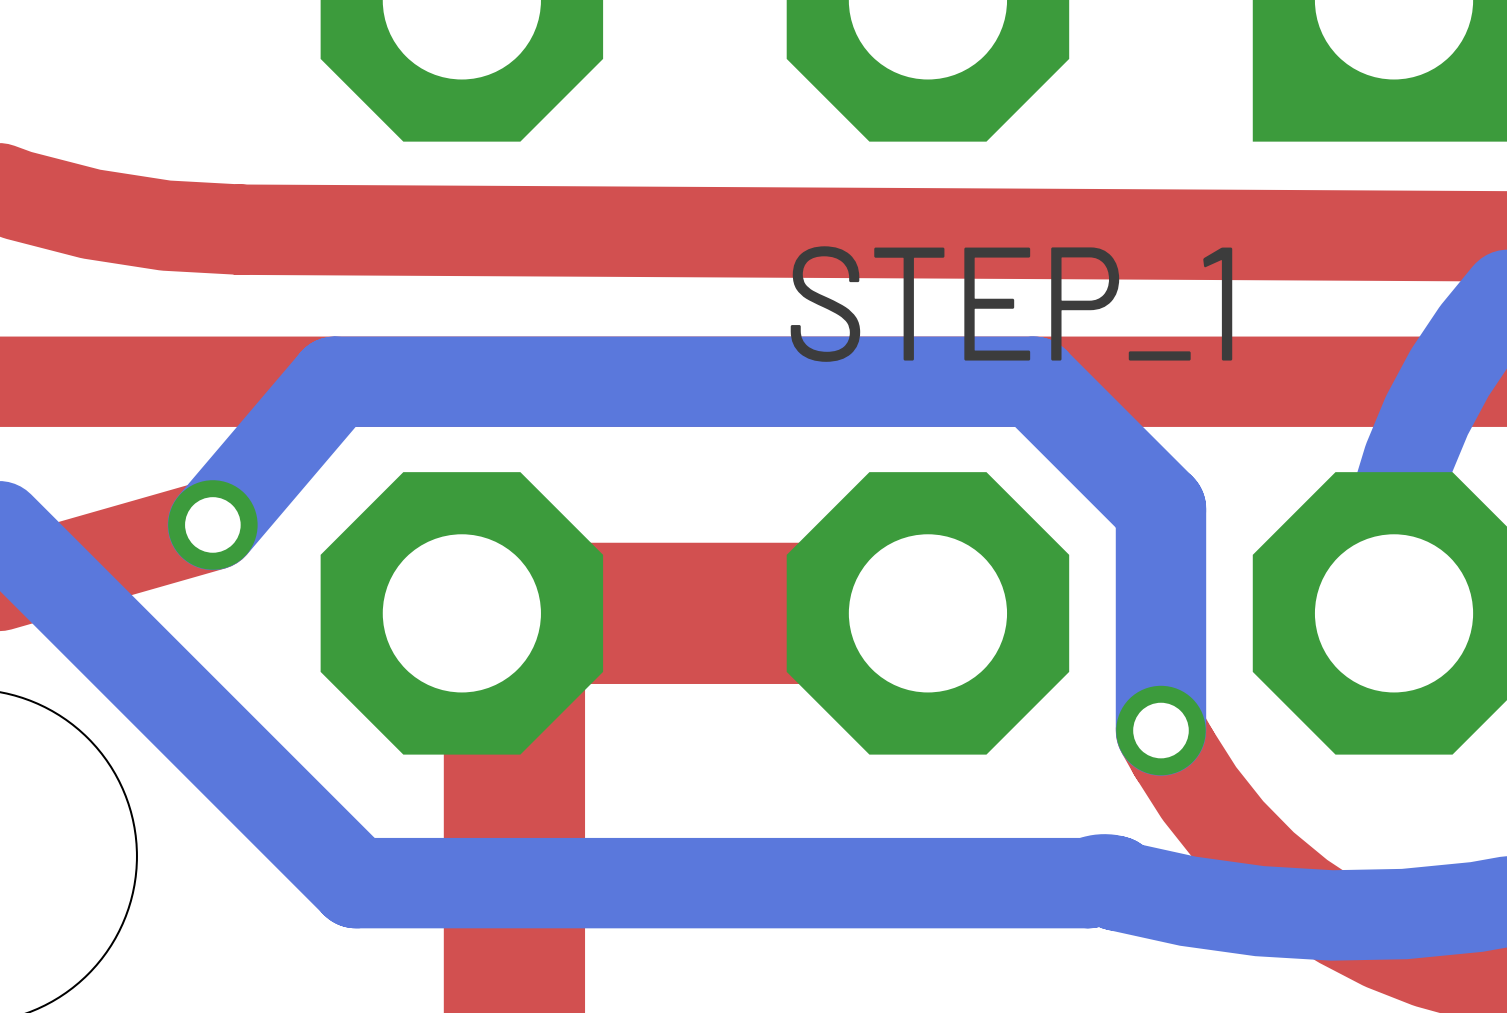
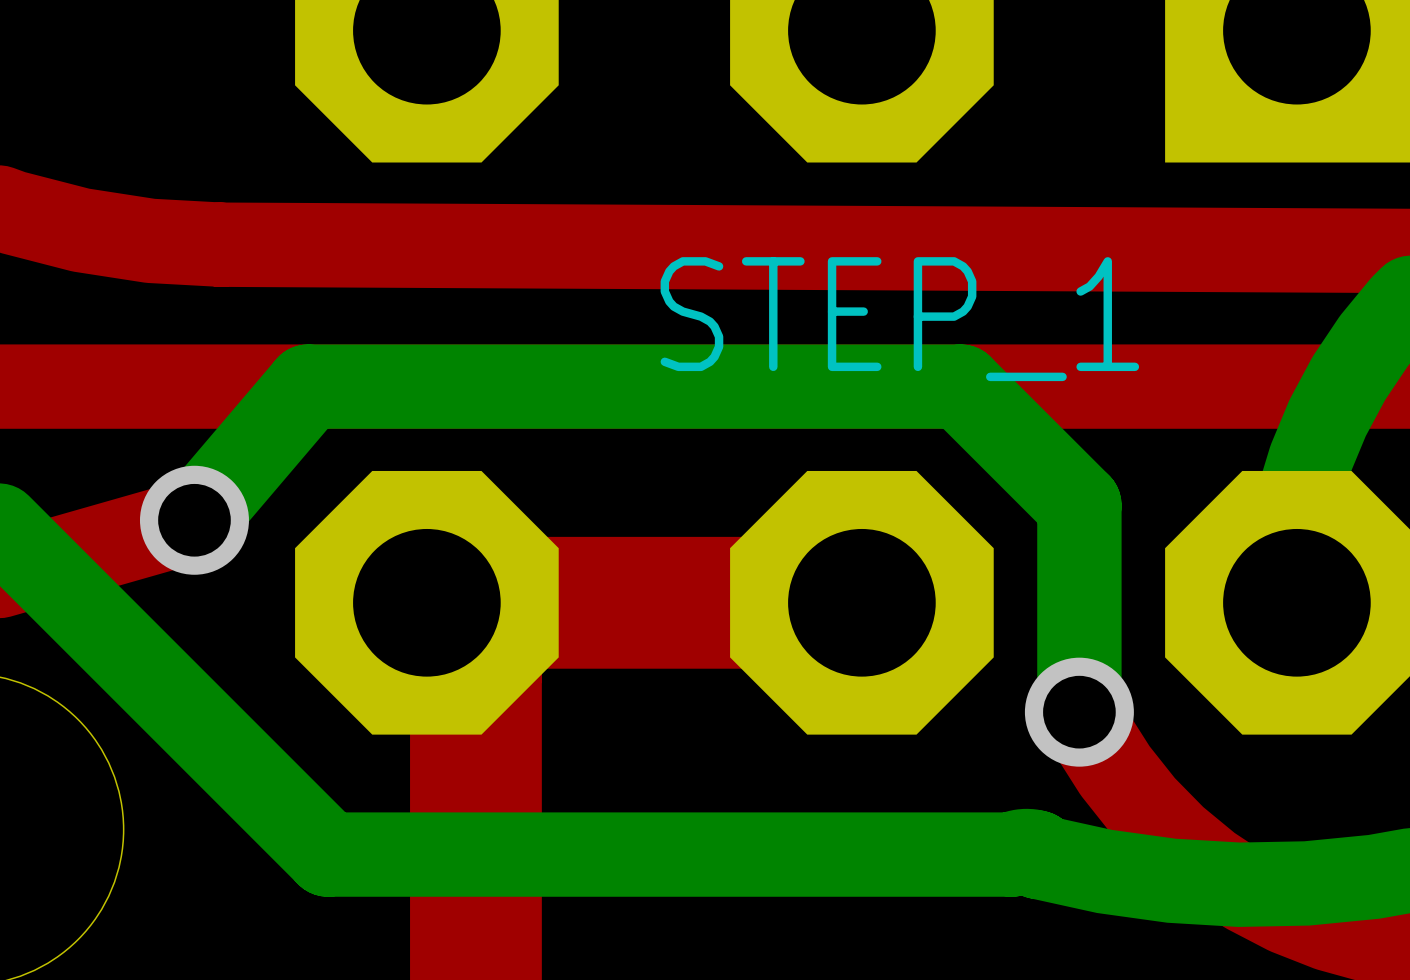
via size: [168, 480, 258, 570] -> [139, 465, 249, 575]
via size: [1116, 685, 1206, 776] -> [1024, 657, 1134, 767]

